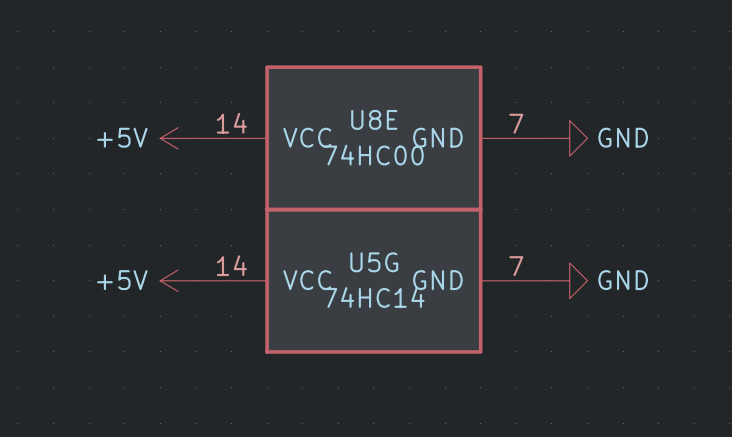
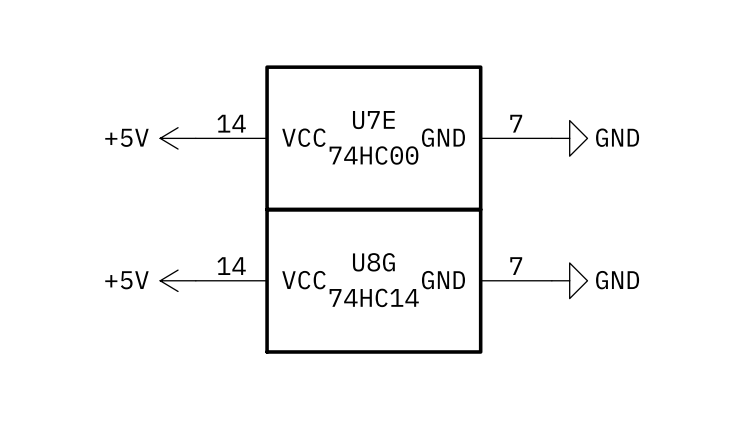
U8E name: U8E (374, 119) -> U7E (373, 120)
U5G name: U5G (374, 262) -> U8G (373, 262)

